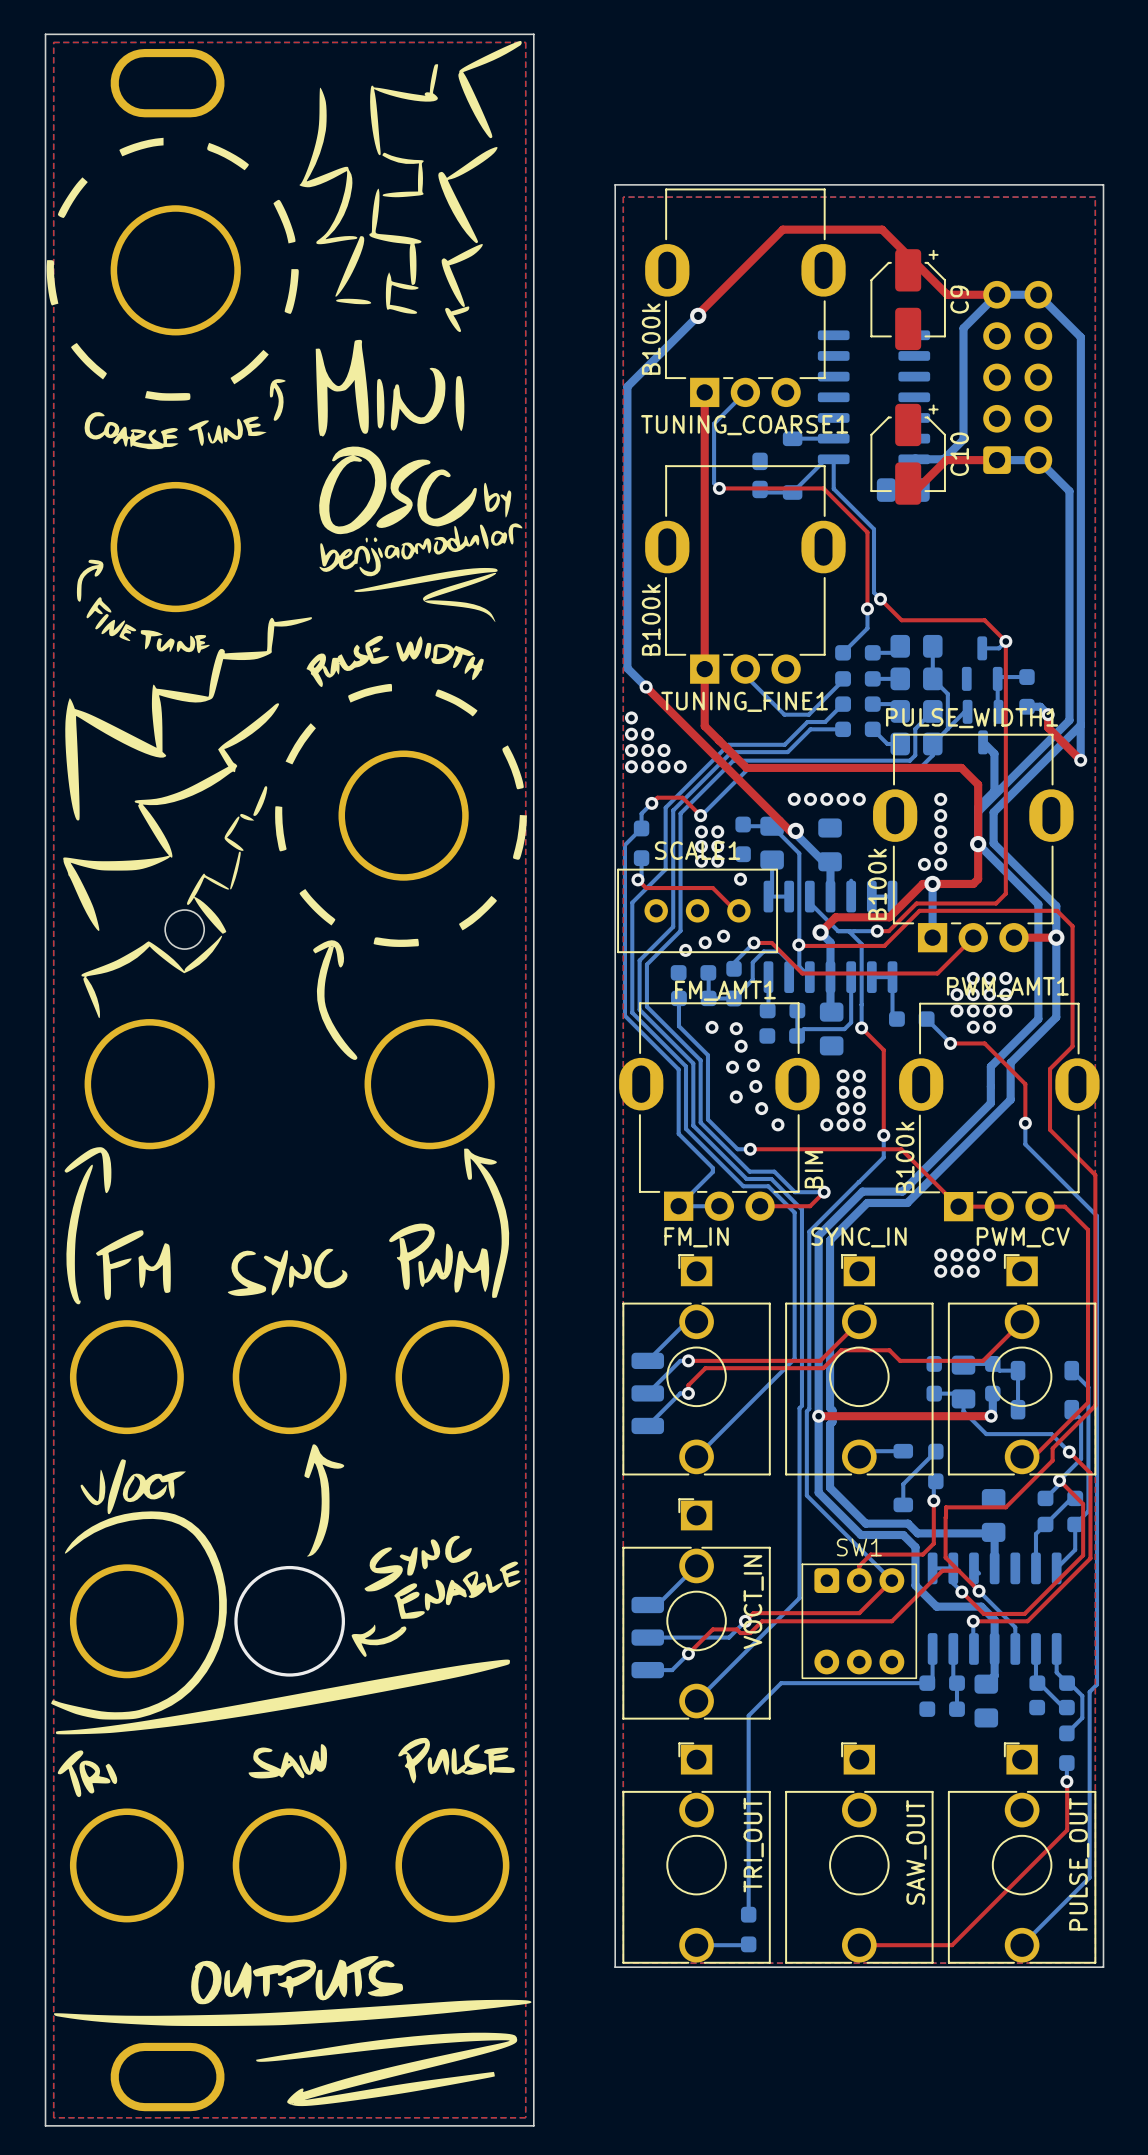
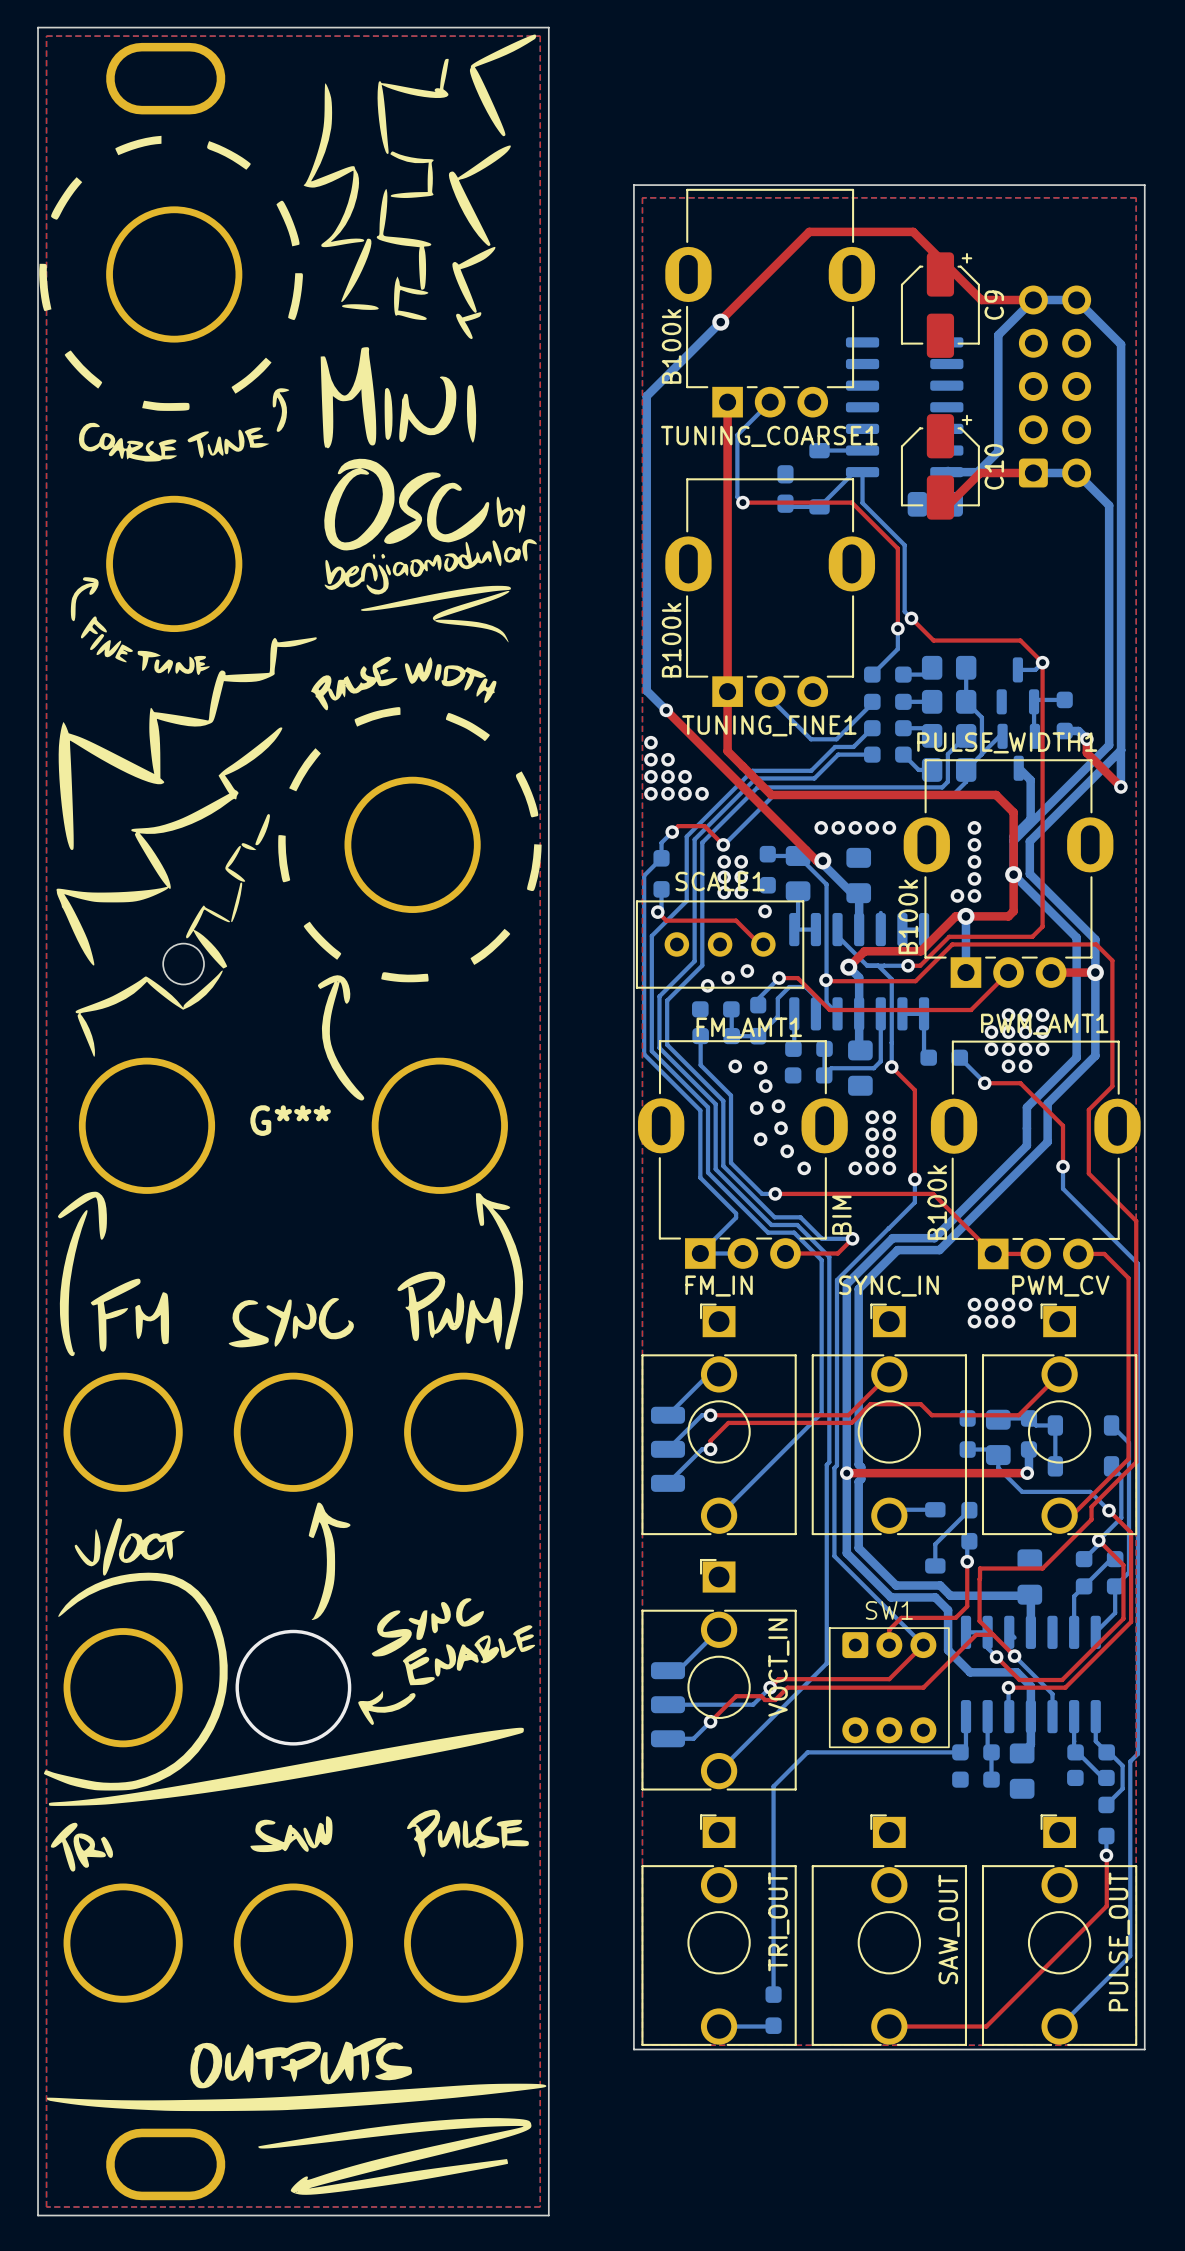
G***: none -> (292, 1114)

